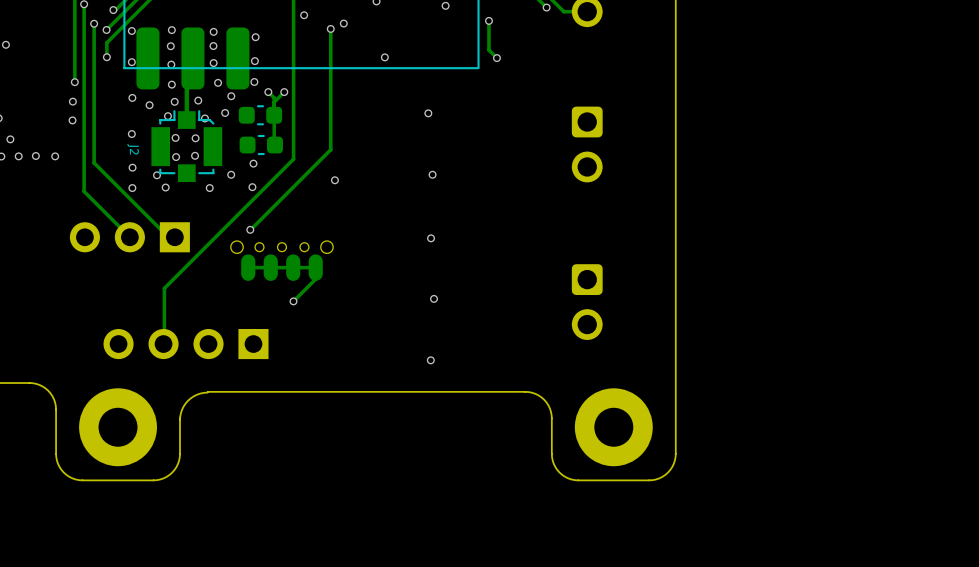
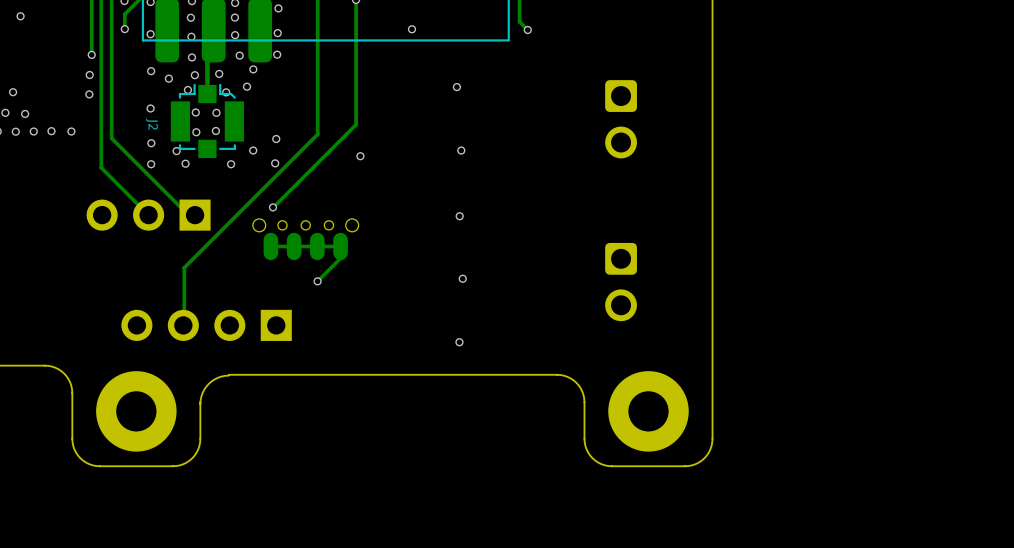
track: (268, 92) (274, 97) (274, 147) -> none
via: (268, 92) -> none
track: (284, 92) (274, 102) -> none
via: (284, 92) -> none
part: (260, 115) -> none
part: (261, 145) -> none

